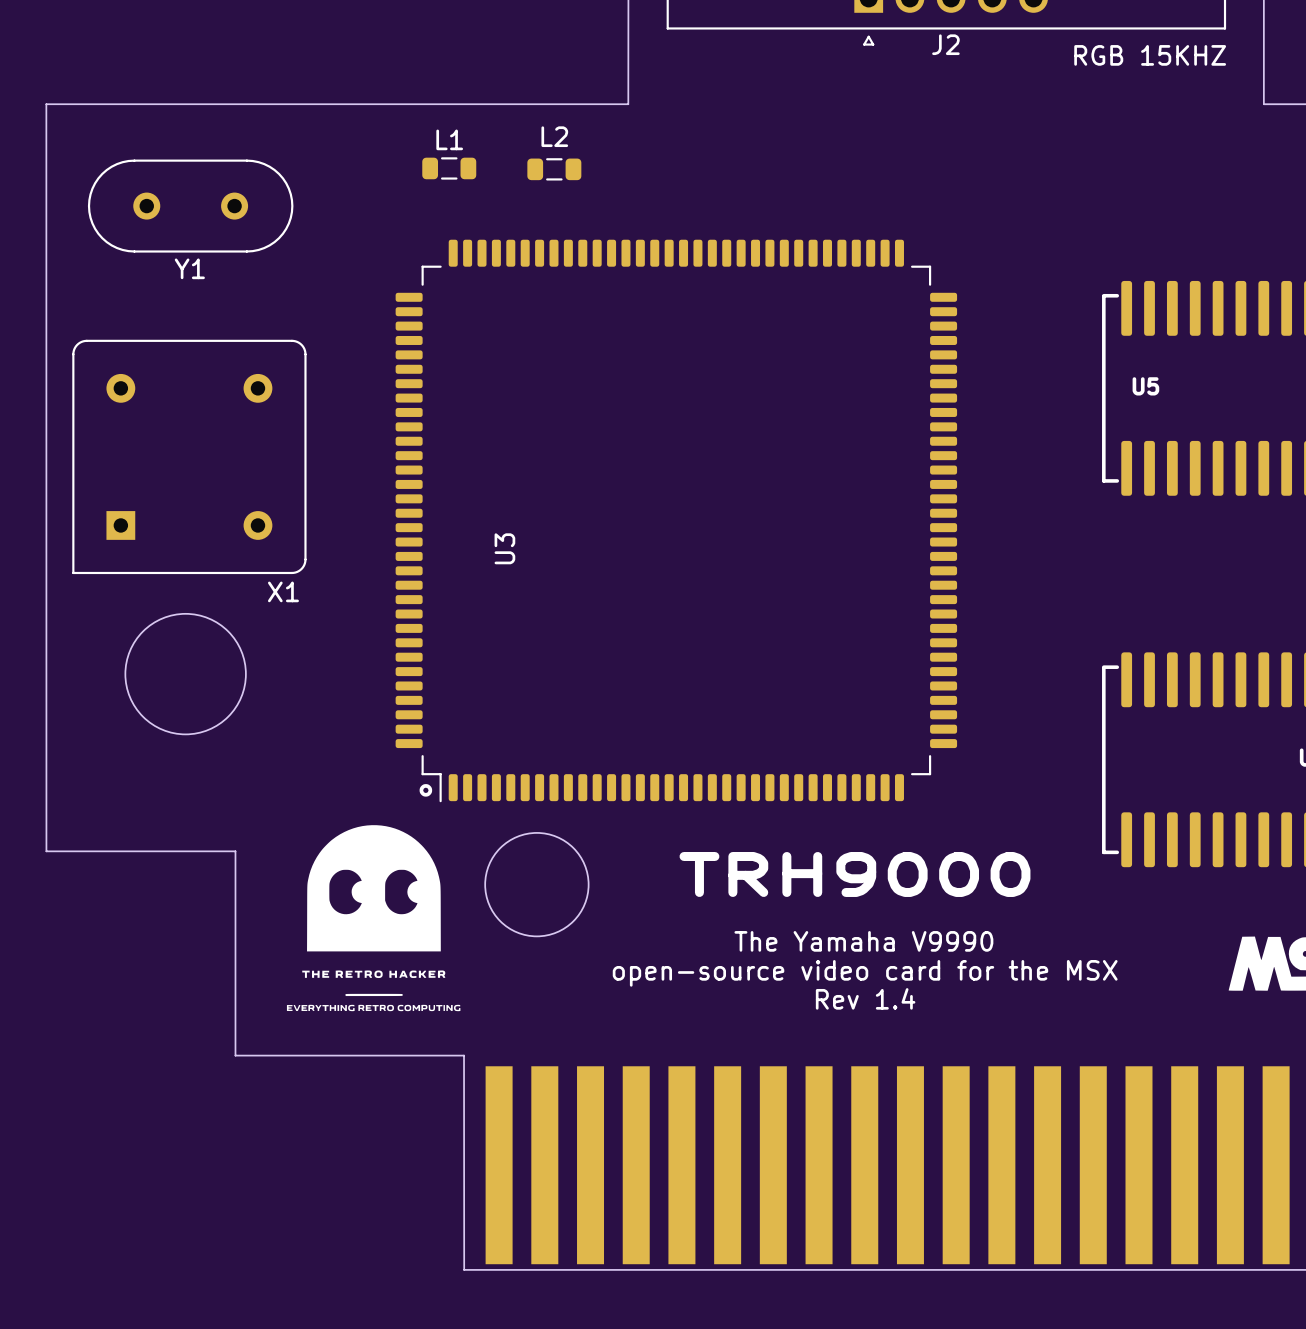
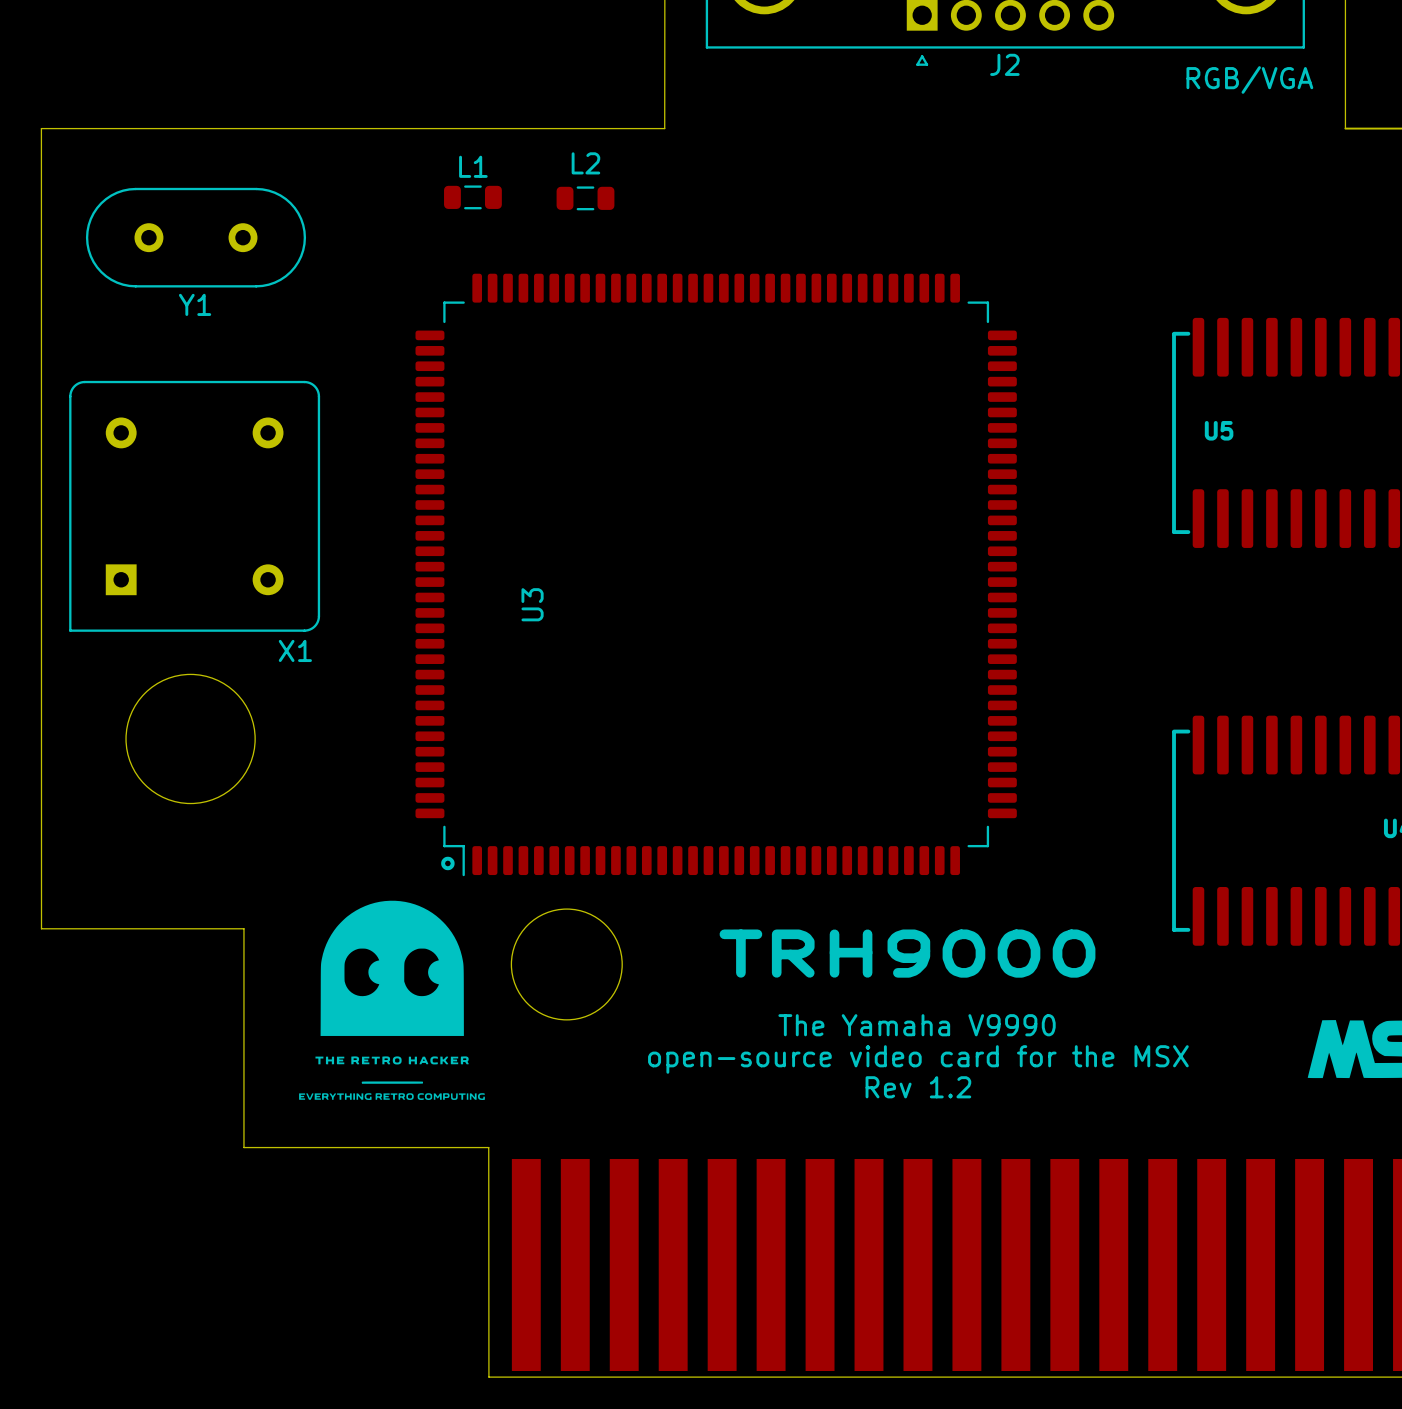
text: RGB 15KHZ (1150, 55) -> none
text: none -> RGB/VGA (1249, 79)
text: Rev 1.4 (865, 998) -> Rev 1.2 (918, 1087)

